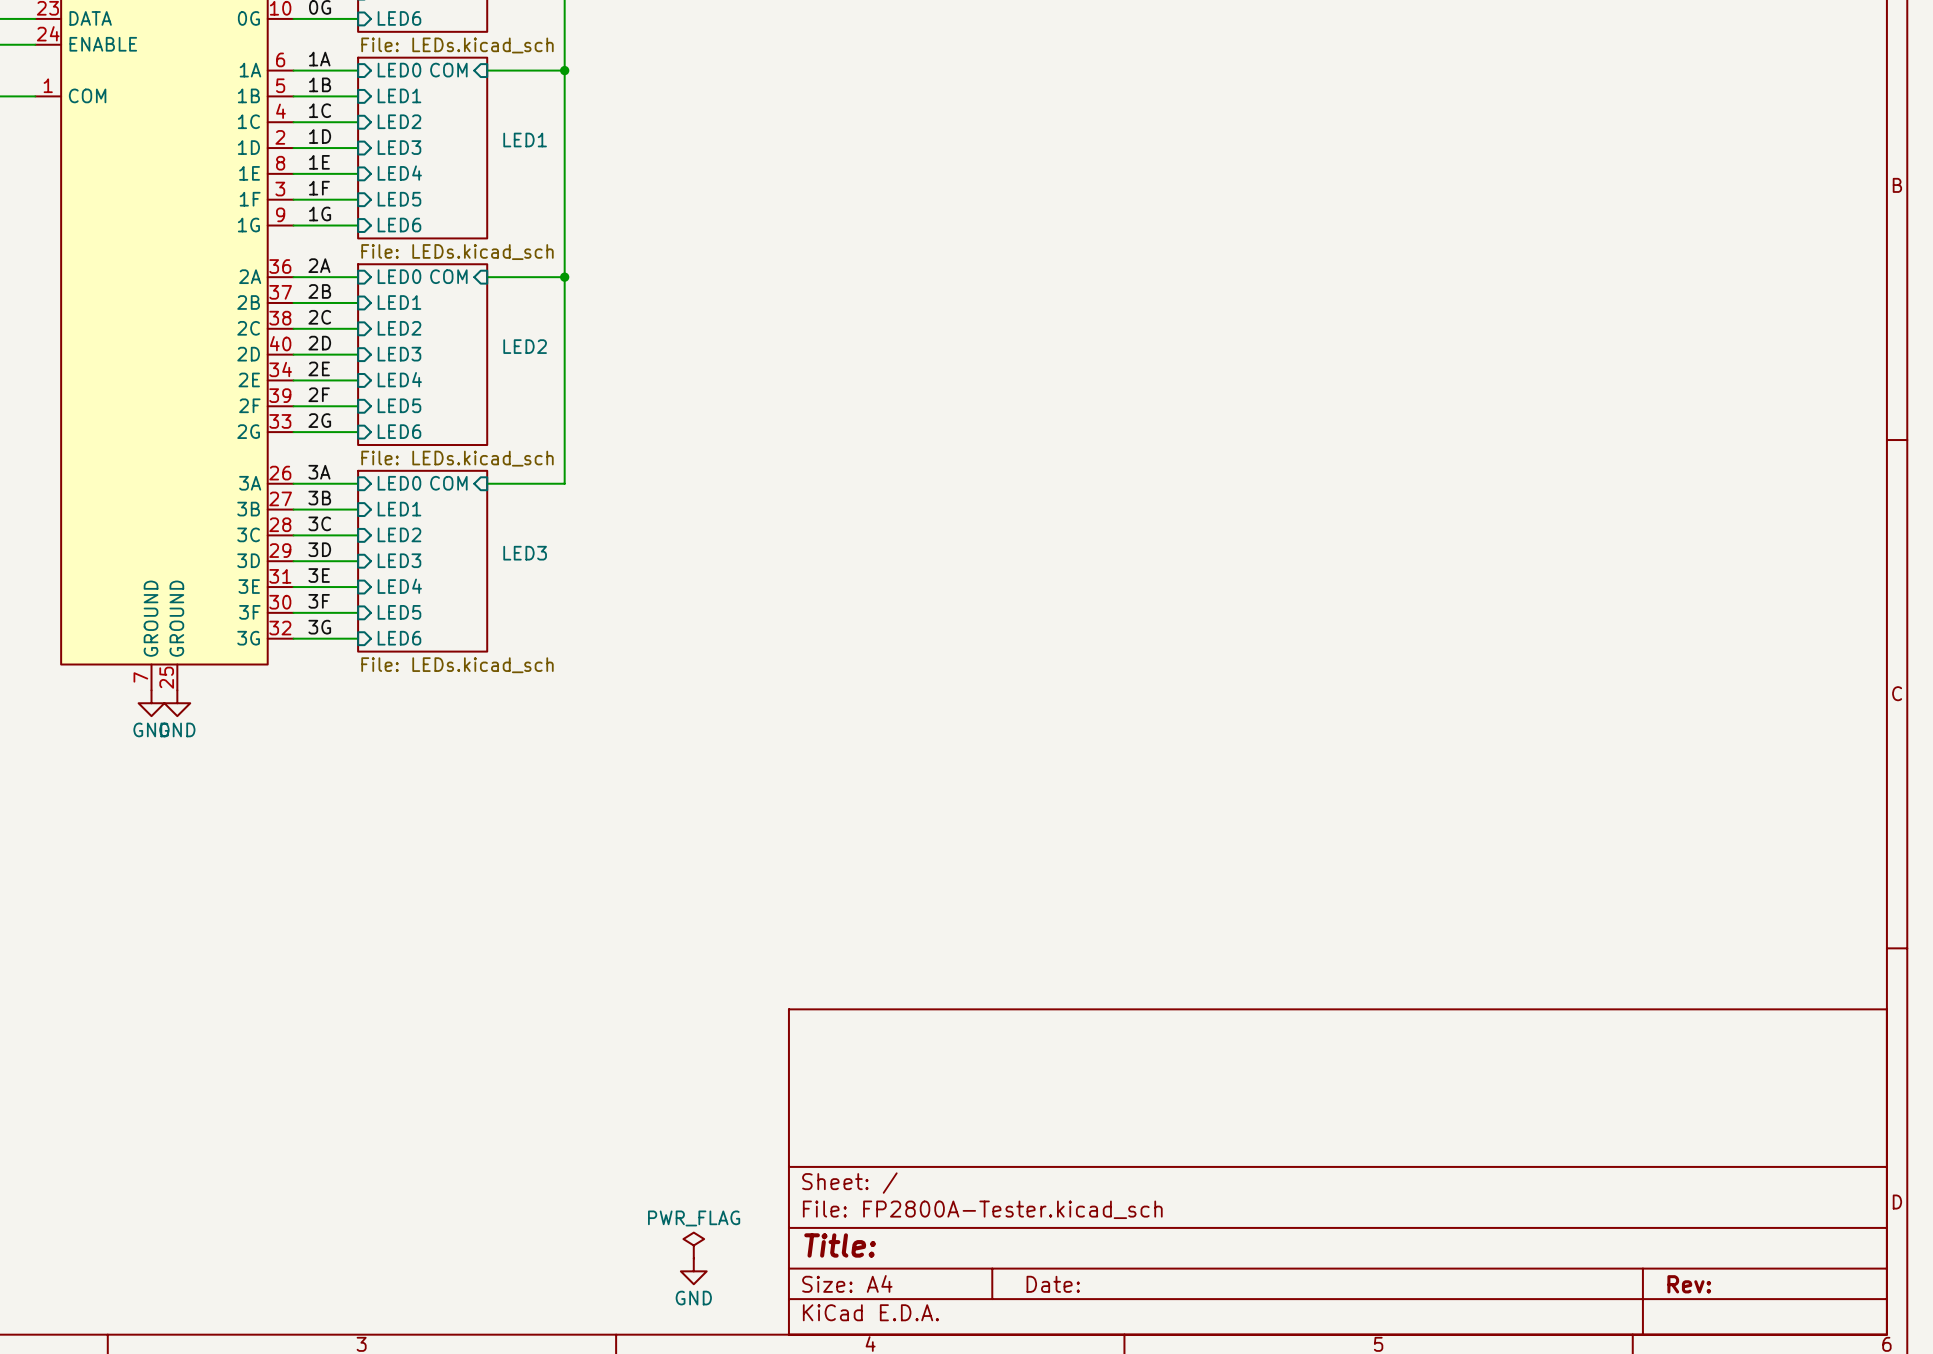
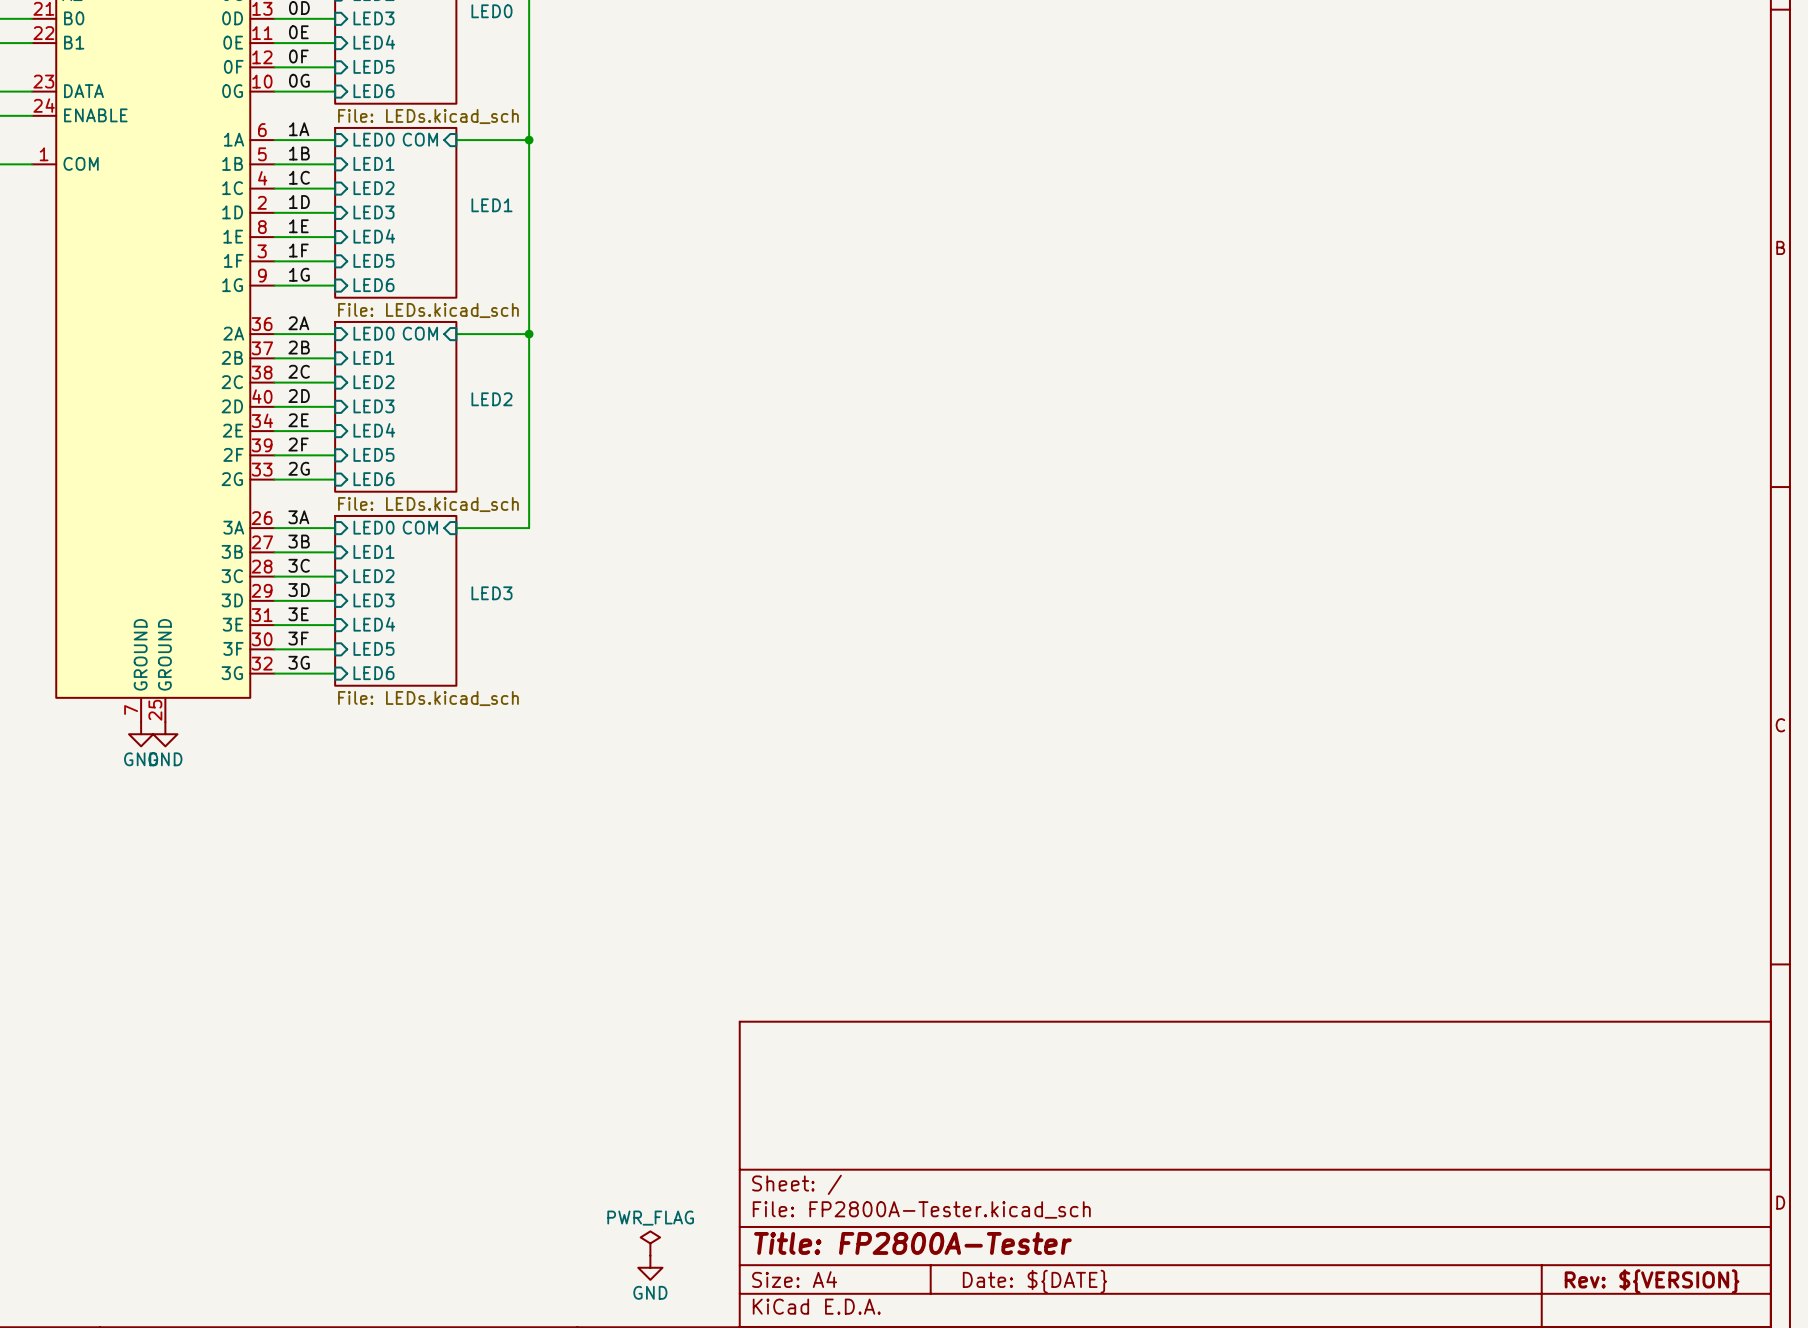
title block: Title: (840, 1245) -> Title: FP2800A-Tester (912, 1243)
title block: Date: (1053, 1284) -> Date: ${DATE} (1034, 1281)
title block: Rev: (1689, 1284) -> Rev: ${VERSION} (1652, 1281)

